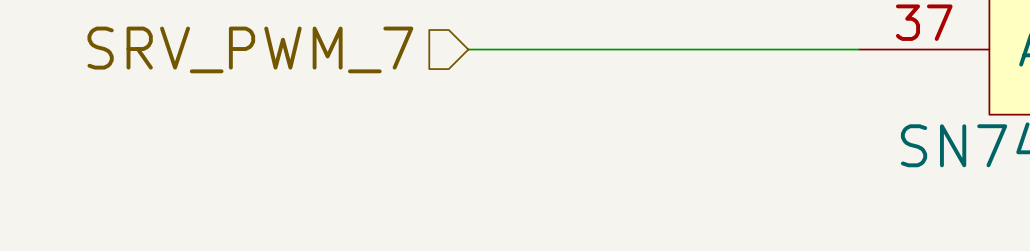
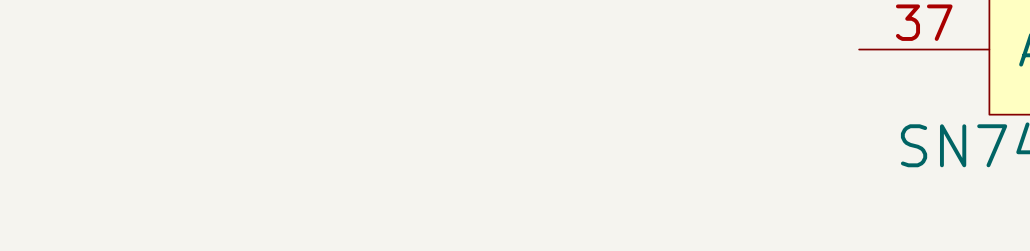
hierarchical label: SRV_PWM_7 (250, 49) -> none
wire: (468, 49) (859, 49) -> none

